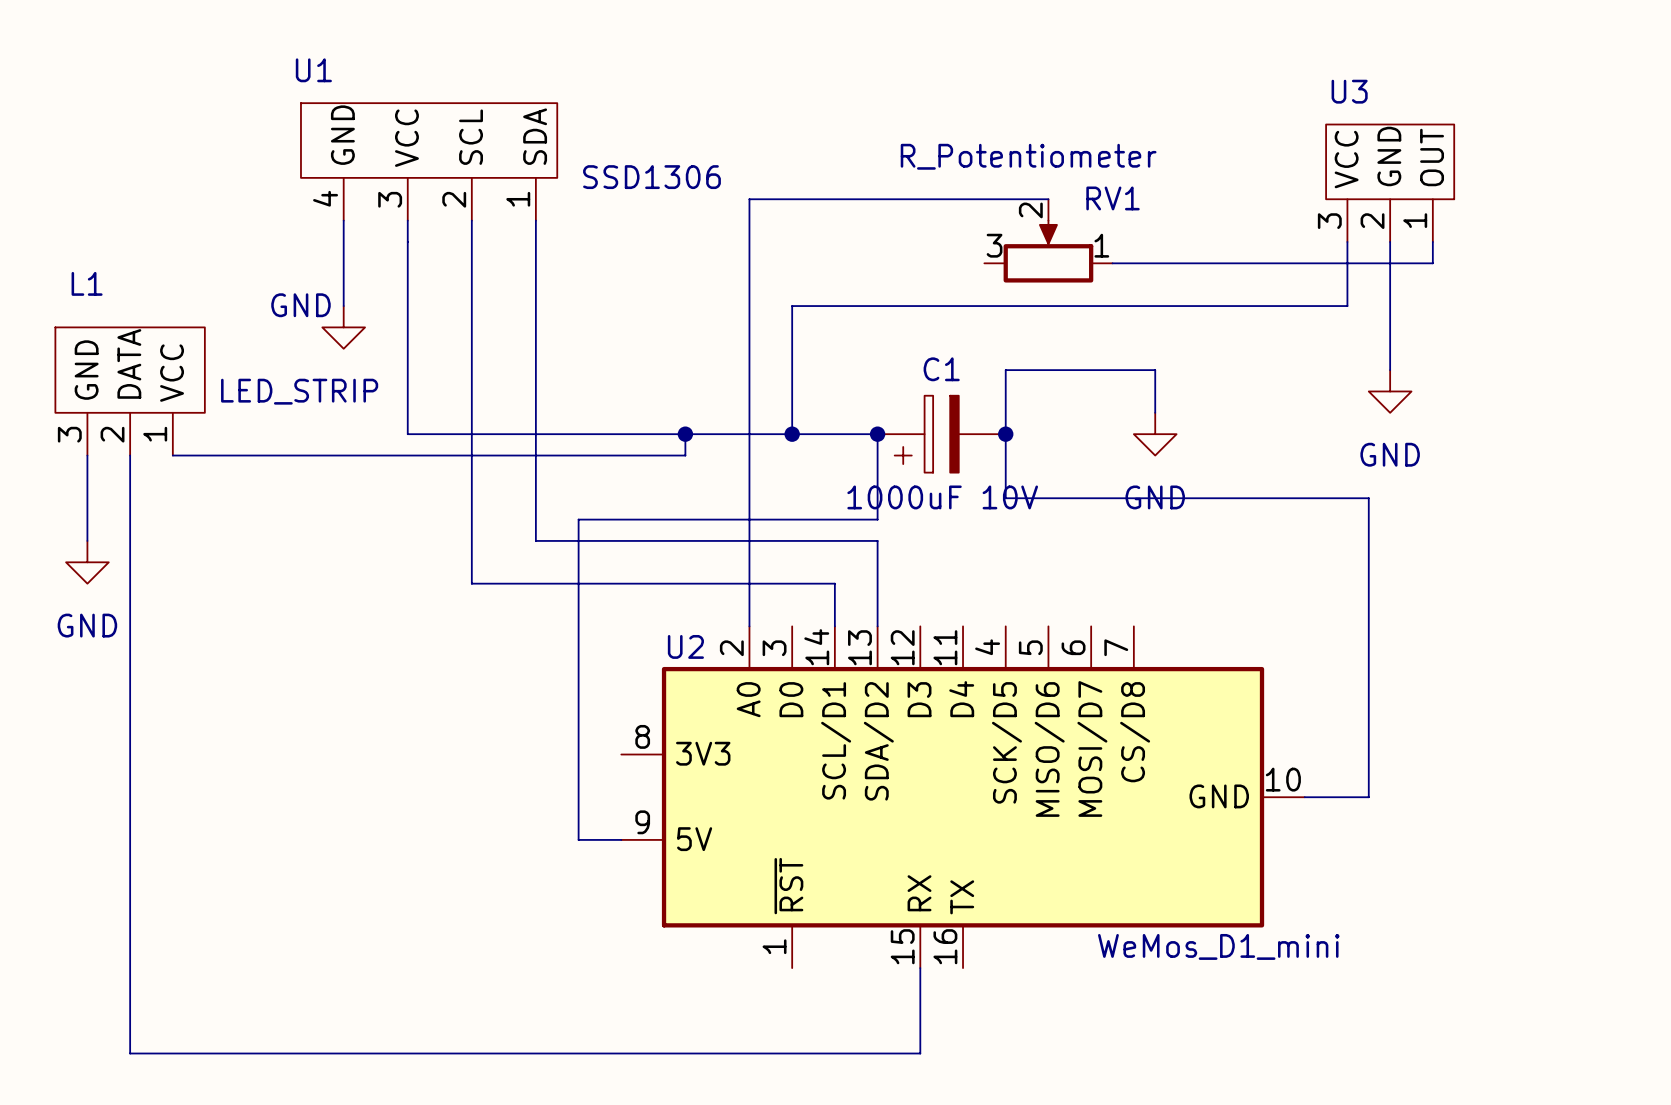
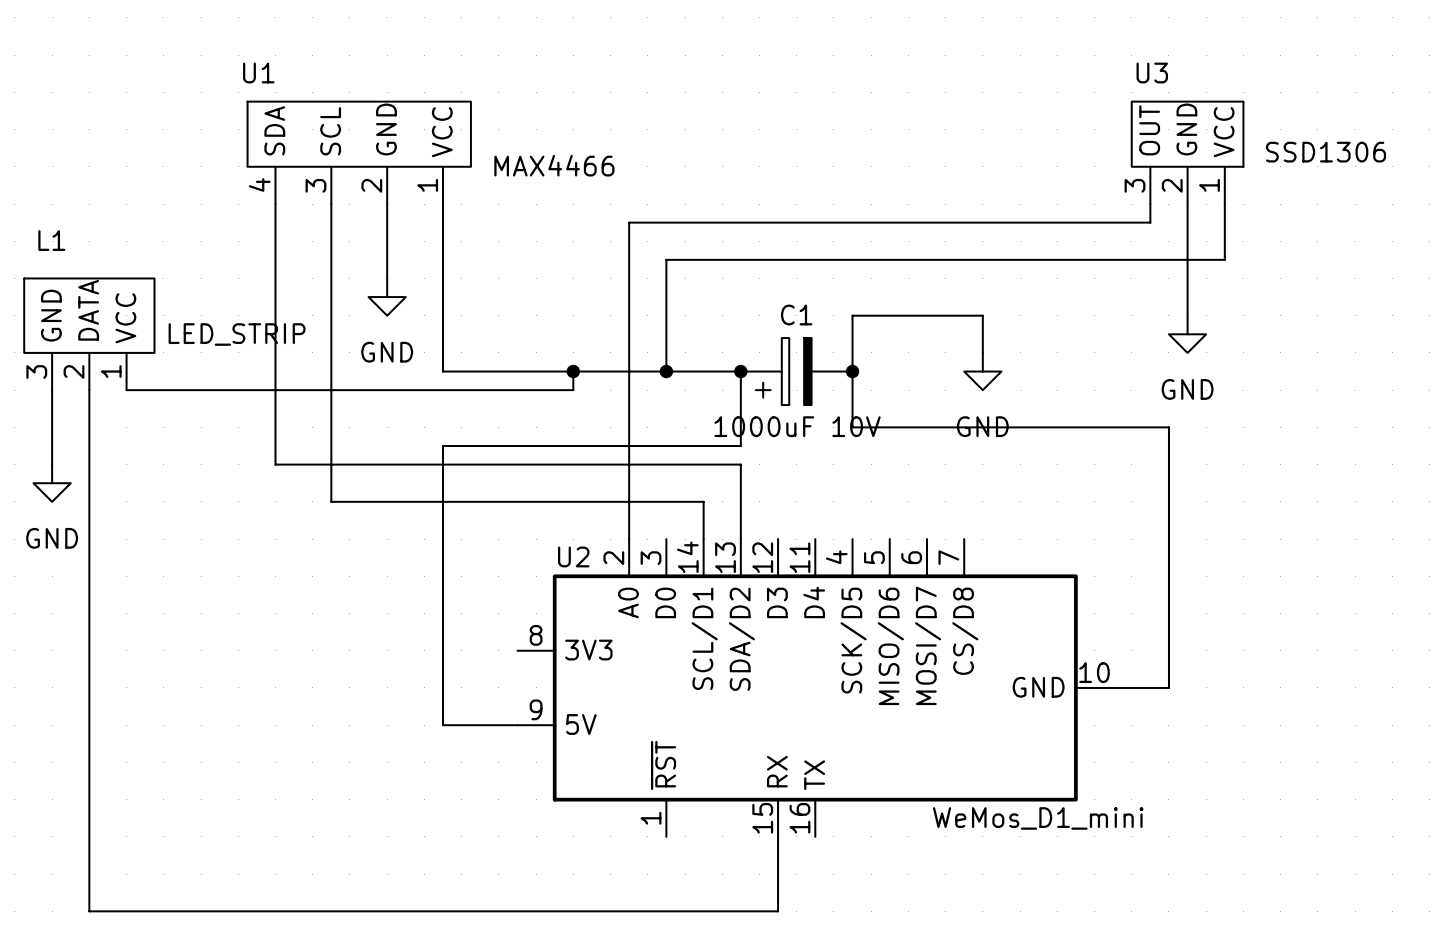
U1 symbol: [300, 103, 558, 221] -> [247, 101, 471, 205]
U3 pin name: OUT (1432, 157) -> VCC (1224, 132)
U3 pin name: VCC (1346, 159) -> OUT (1149, 130)
U1 value: SSD1306 (651, 177) -> MAX4466 (554, 165)
U3 value: none -> SSD1306 (1326, 152)
wire: (1048, 199) (749, 199) (749, 263) -> (945, 222) (629, 222)
RV1: R_Potentiometer (1048, 240) -> none
wire: (1432, 263) (1347, 263) (1347, 306) -> (1224, 222) (1224, 259) (1150, 259)
power symbol text position: GND (300, 305) -> GND (387, 352)
power symbol position: GND (343, 327) -> GND (387, 297)
wire: (471, 327) (471, 583) -> none
wire: (407, 434) (535, 434) (535, 519) -> (331, 371) (331, 501) (387, 501)
wire: none -> (443, 445) (480, 445)
wire: (578, 519) (578, 839) -> (275, 259) (275, 464) (443, 464) (443, 725) (480, 725)

